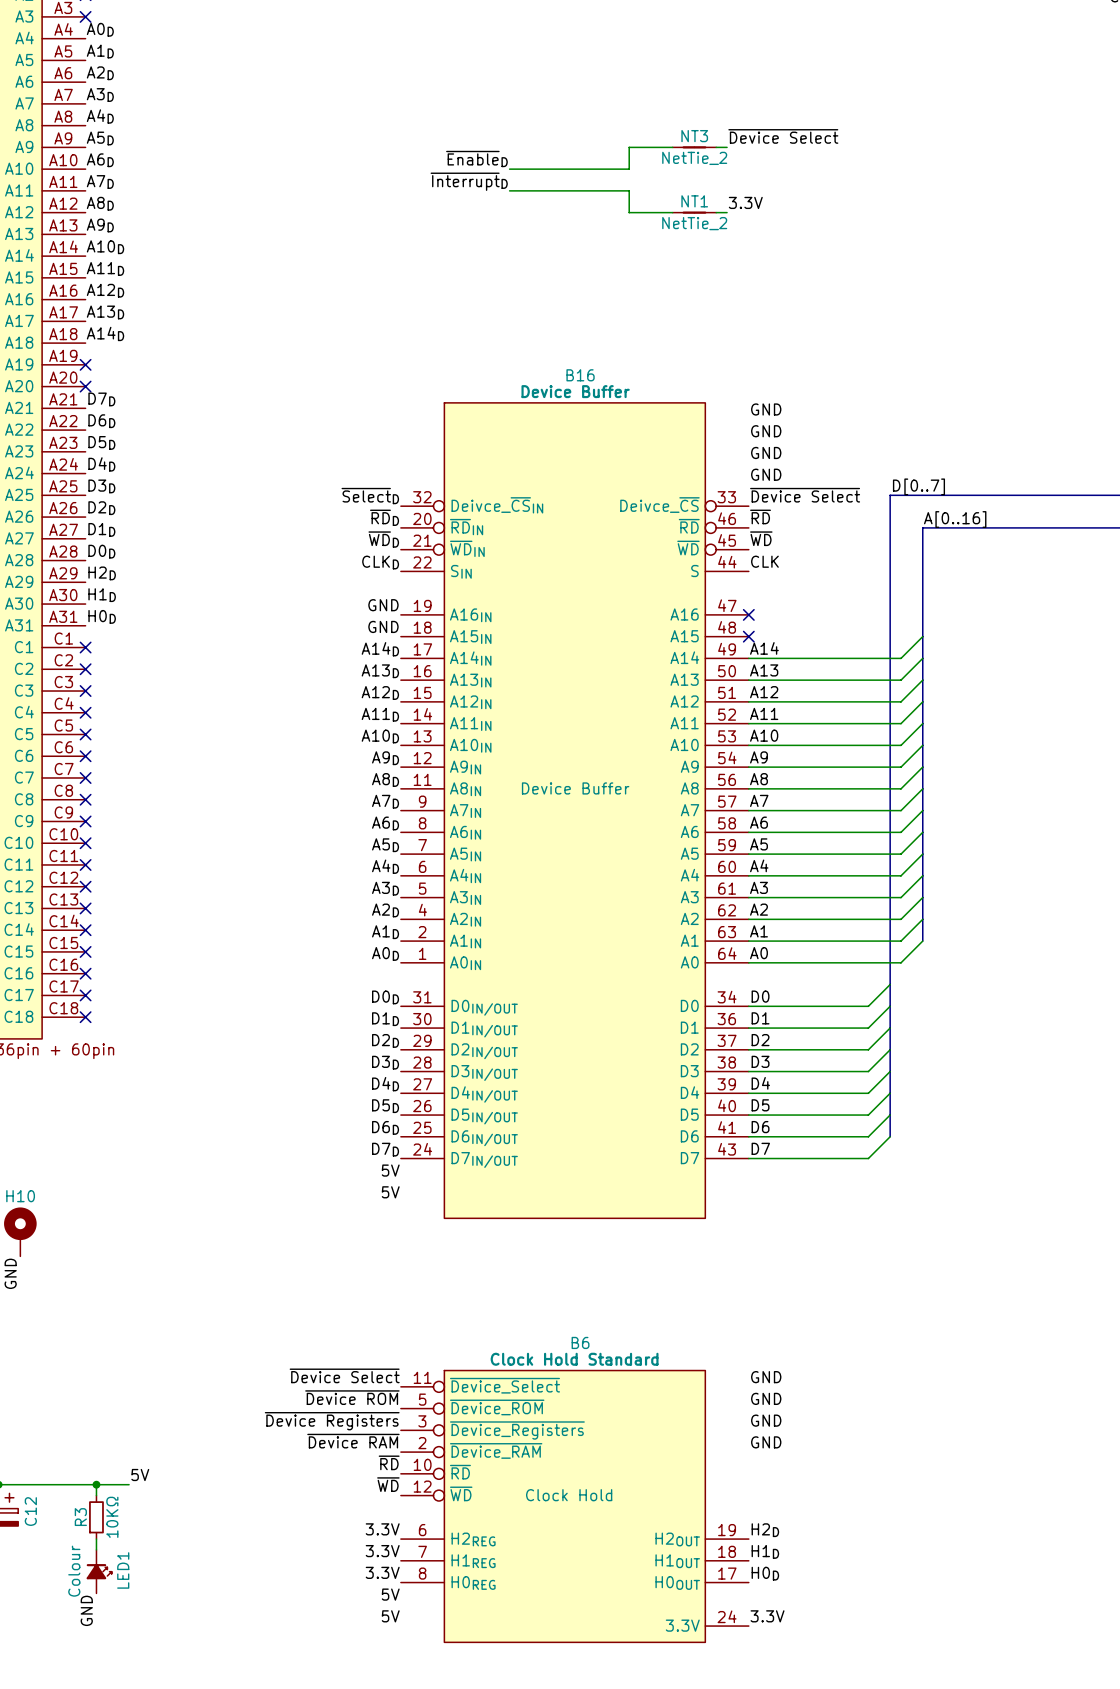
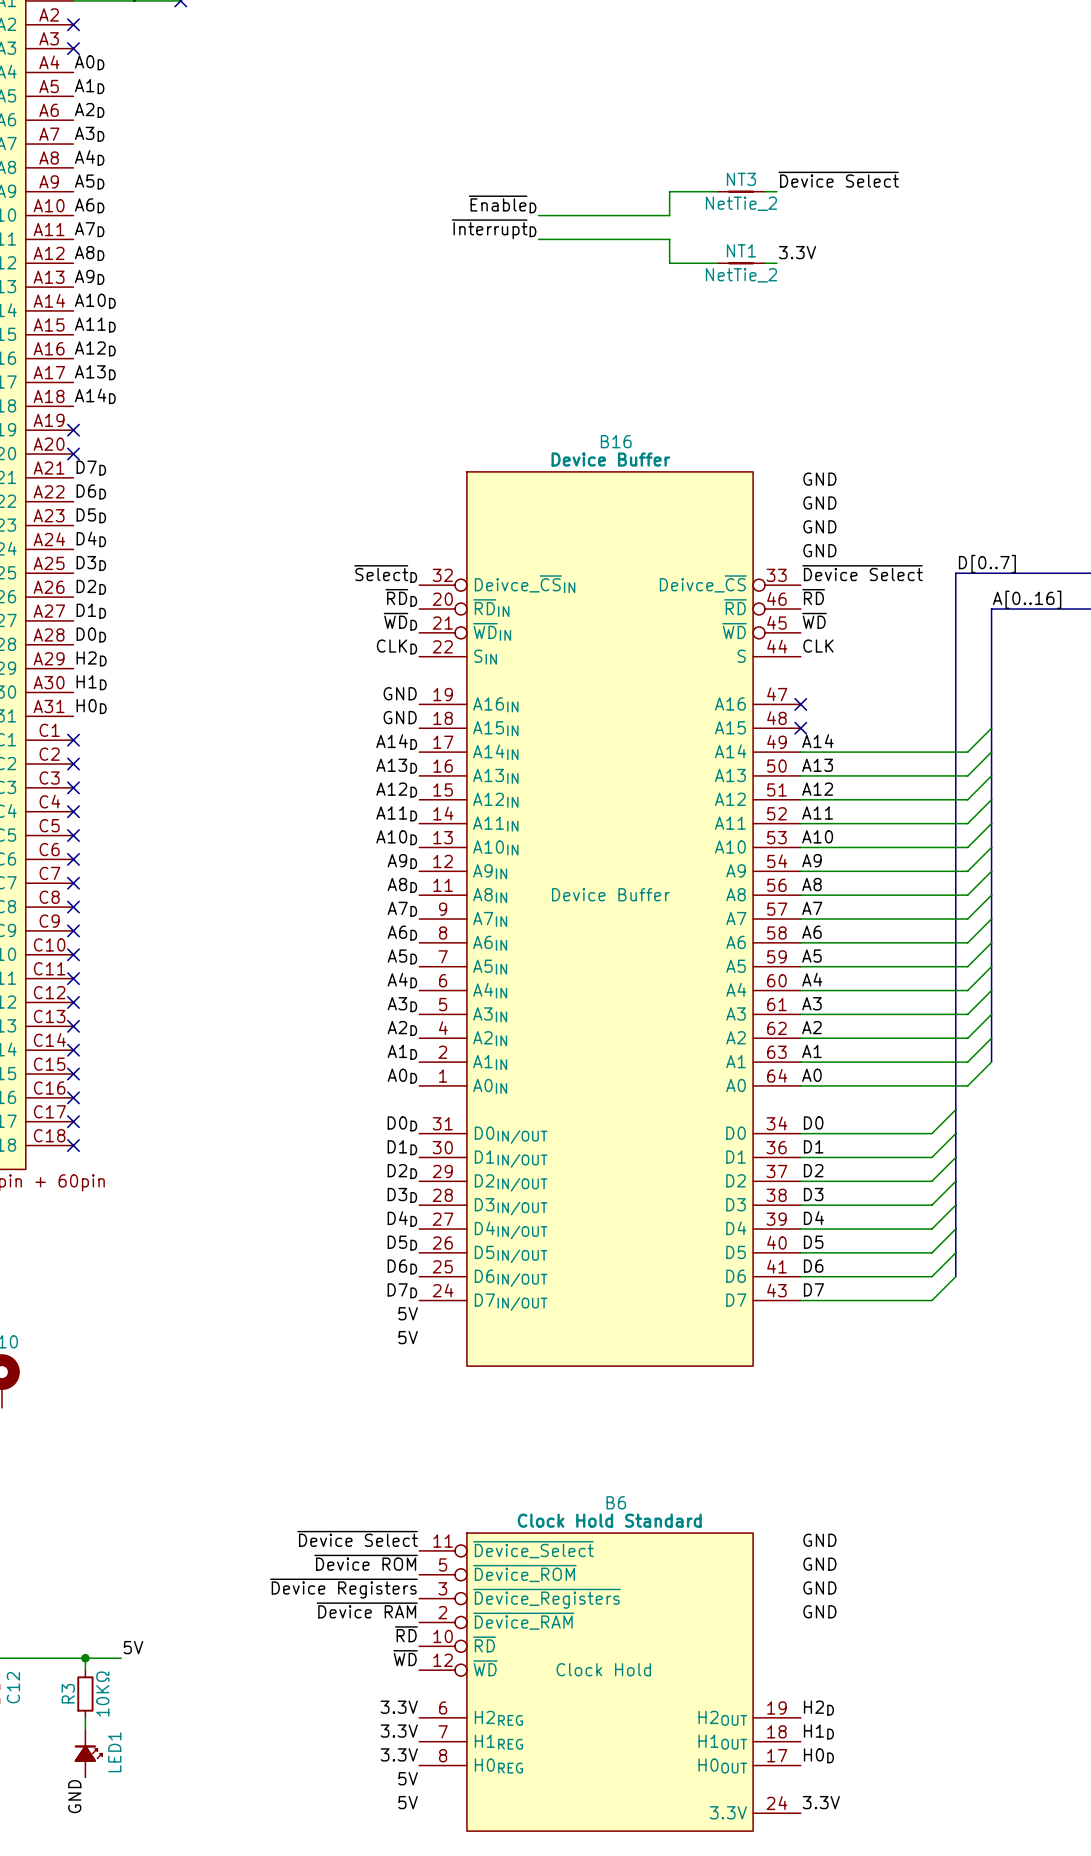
LED1 text: Colour (74, 1571) -> none

